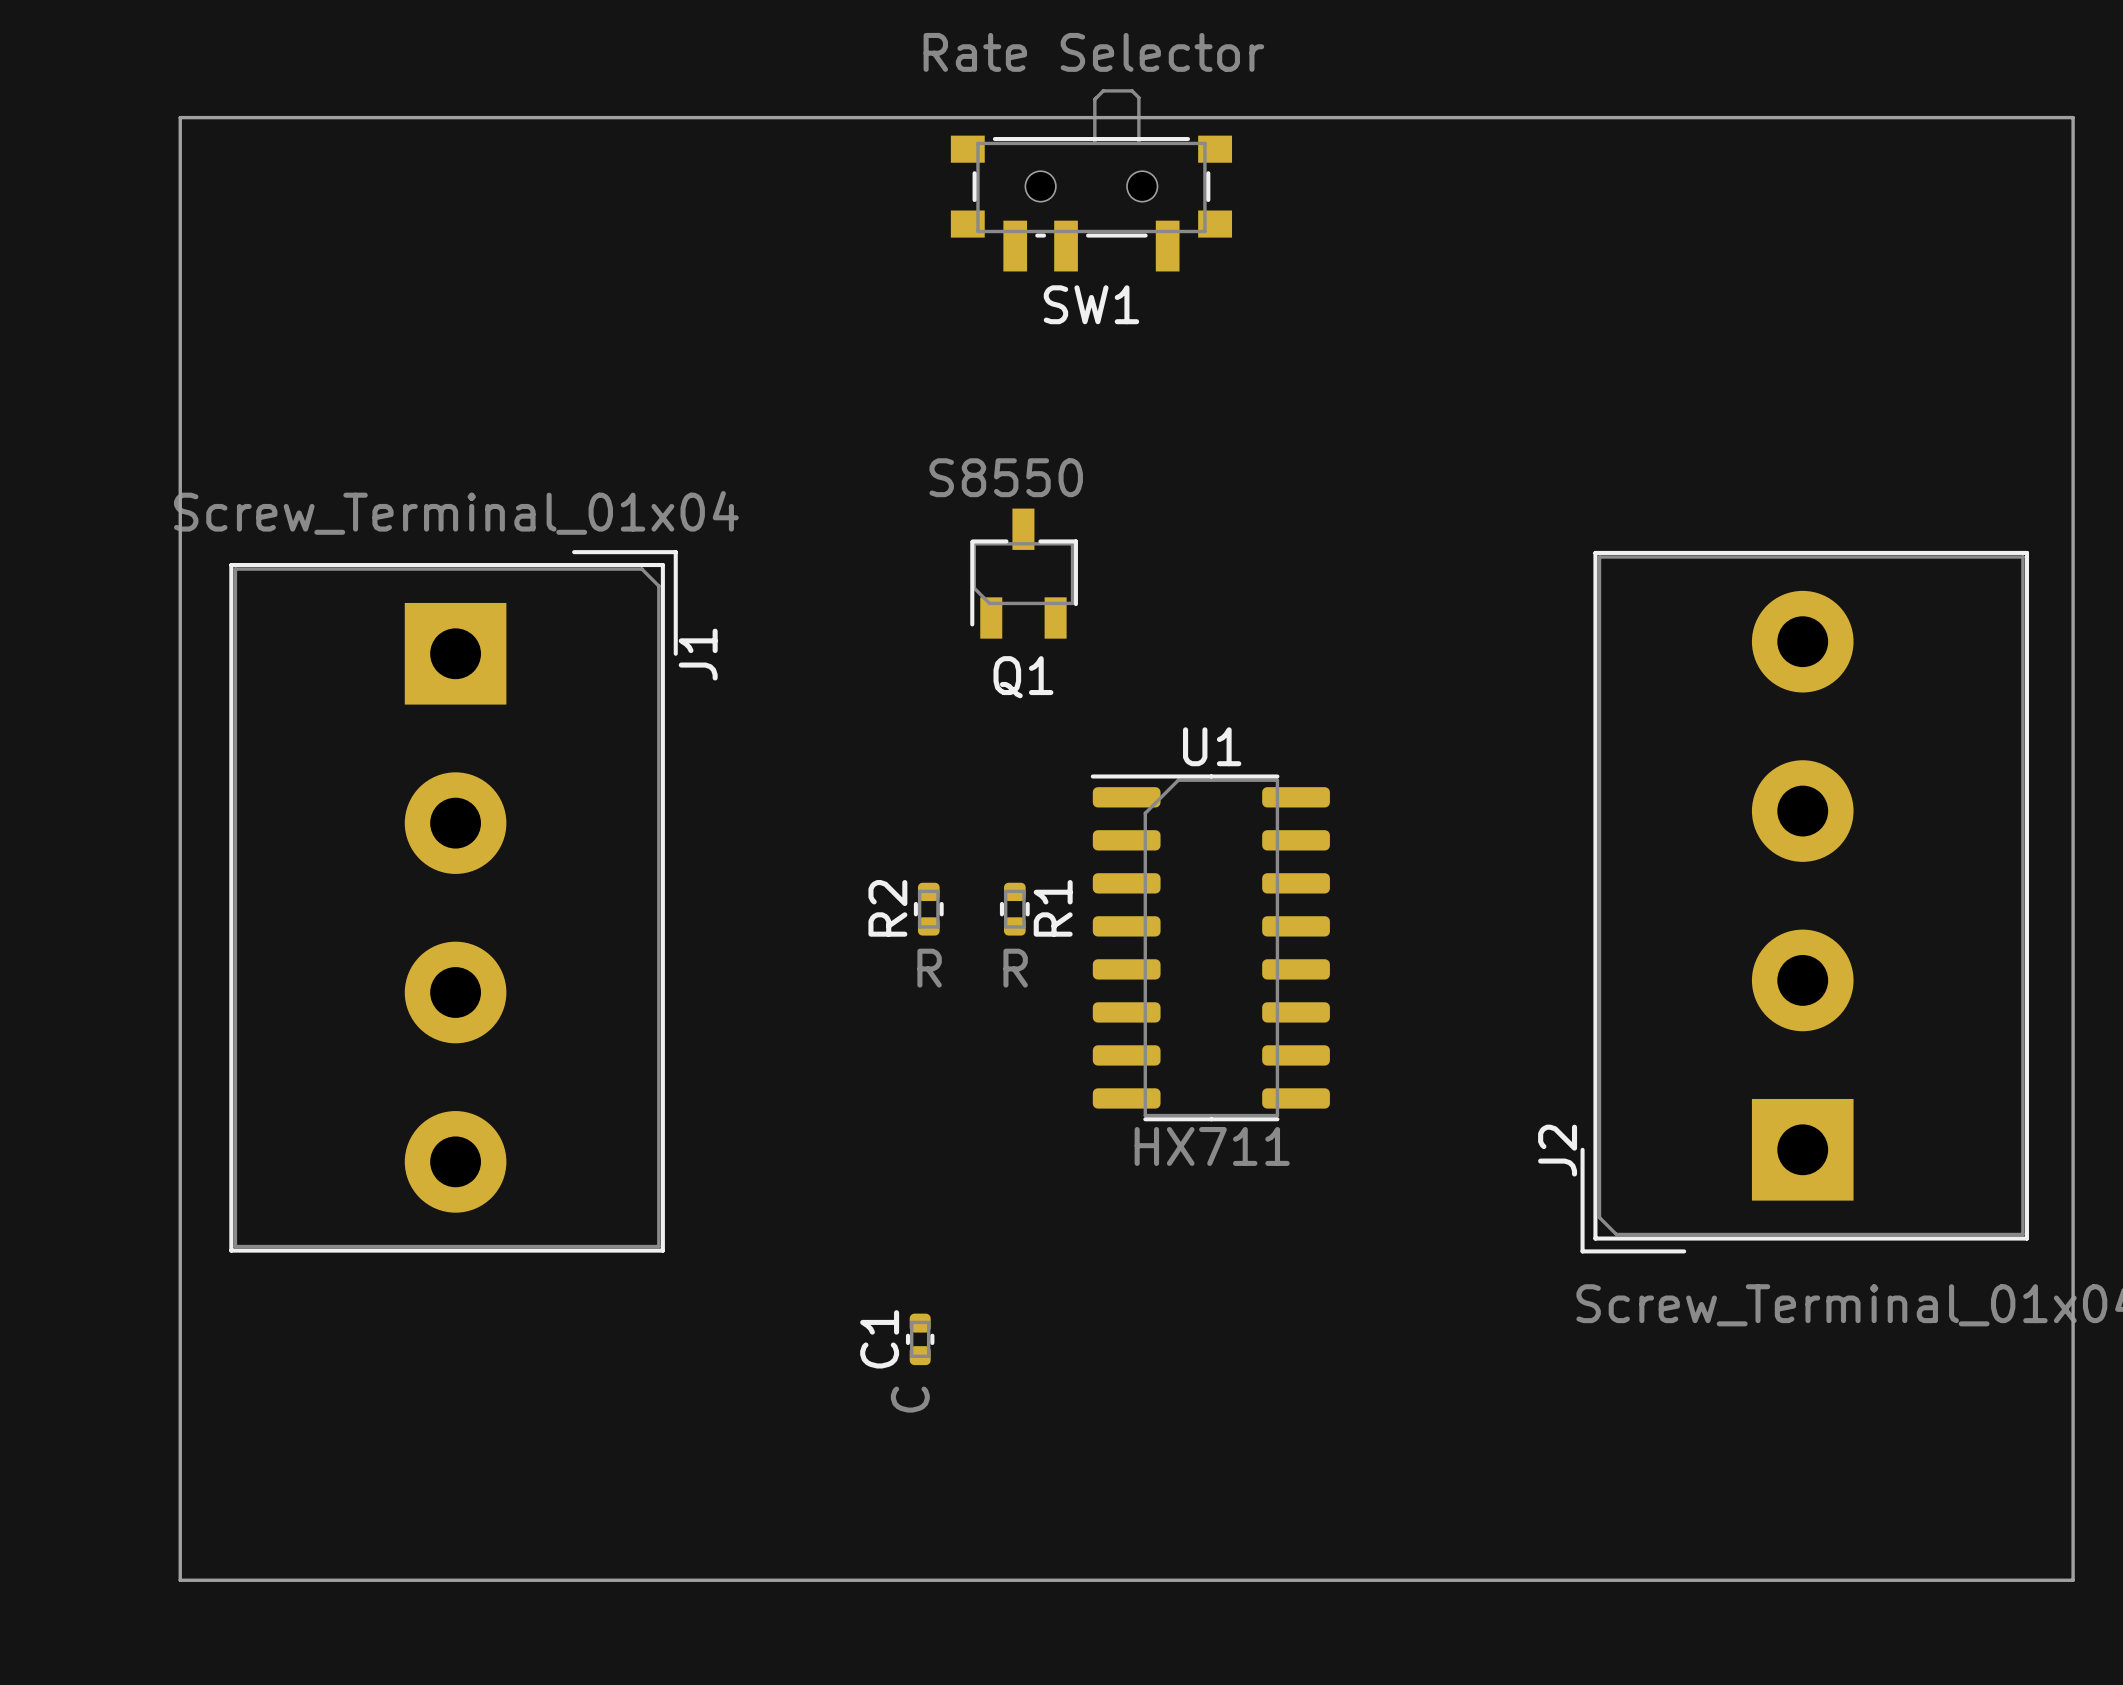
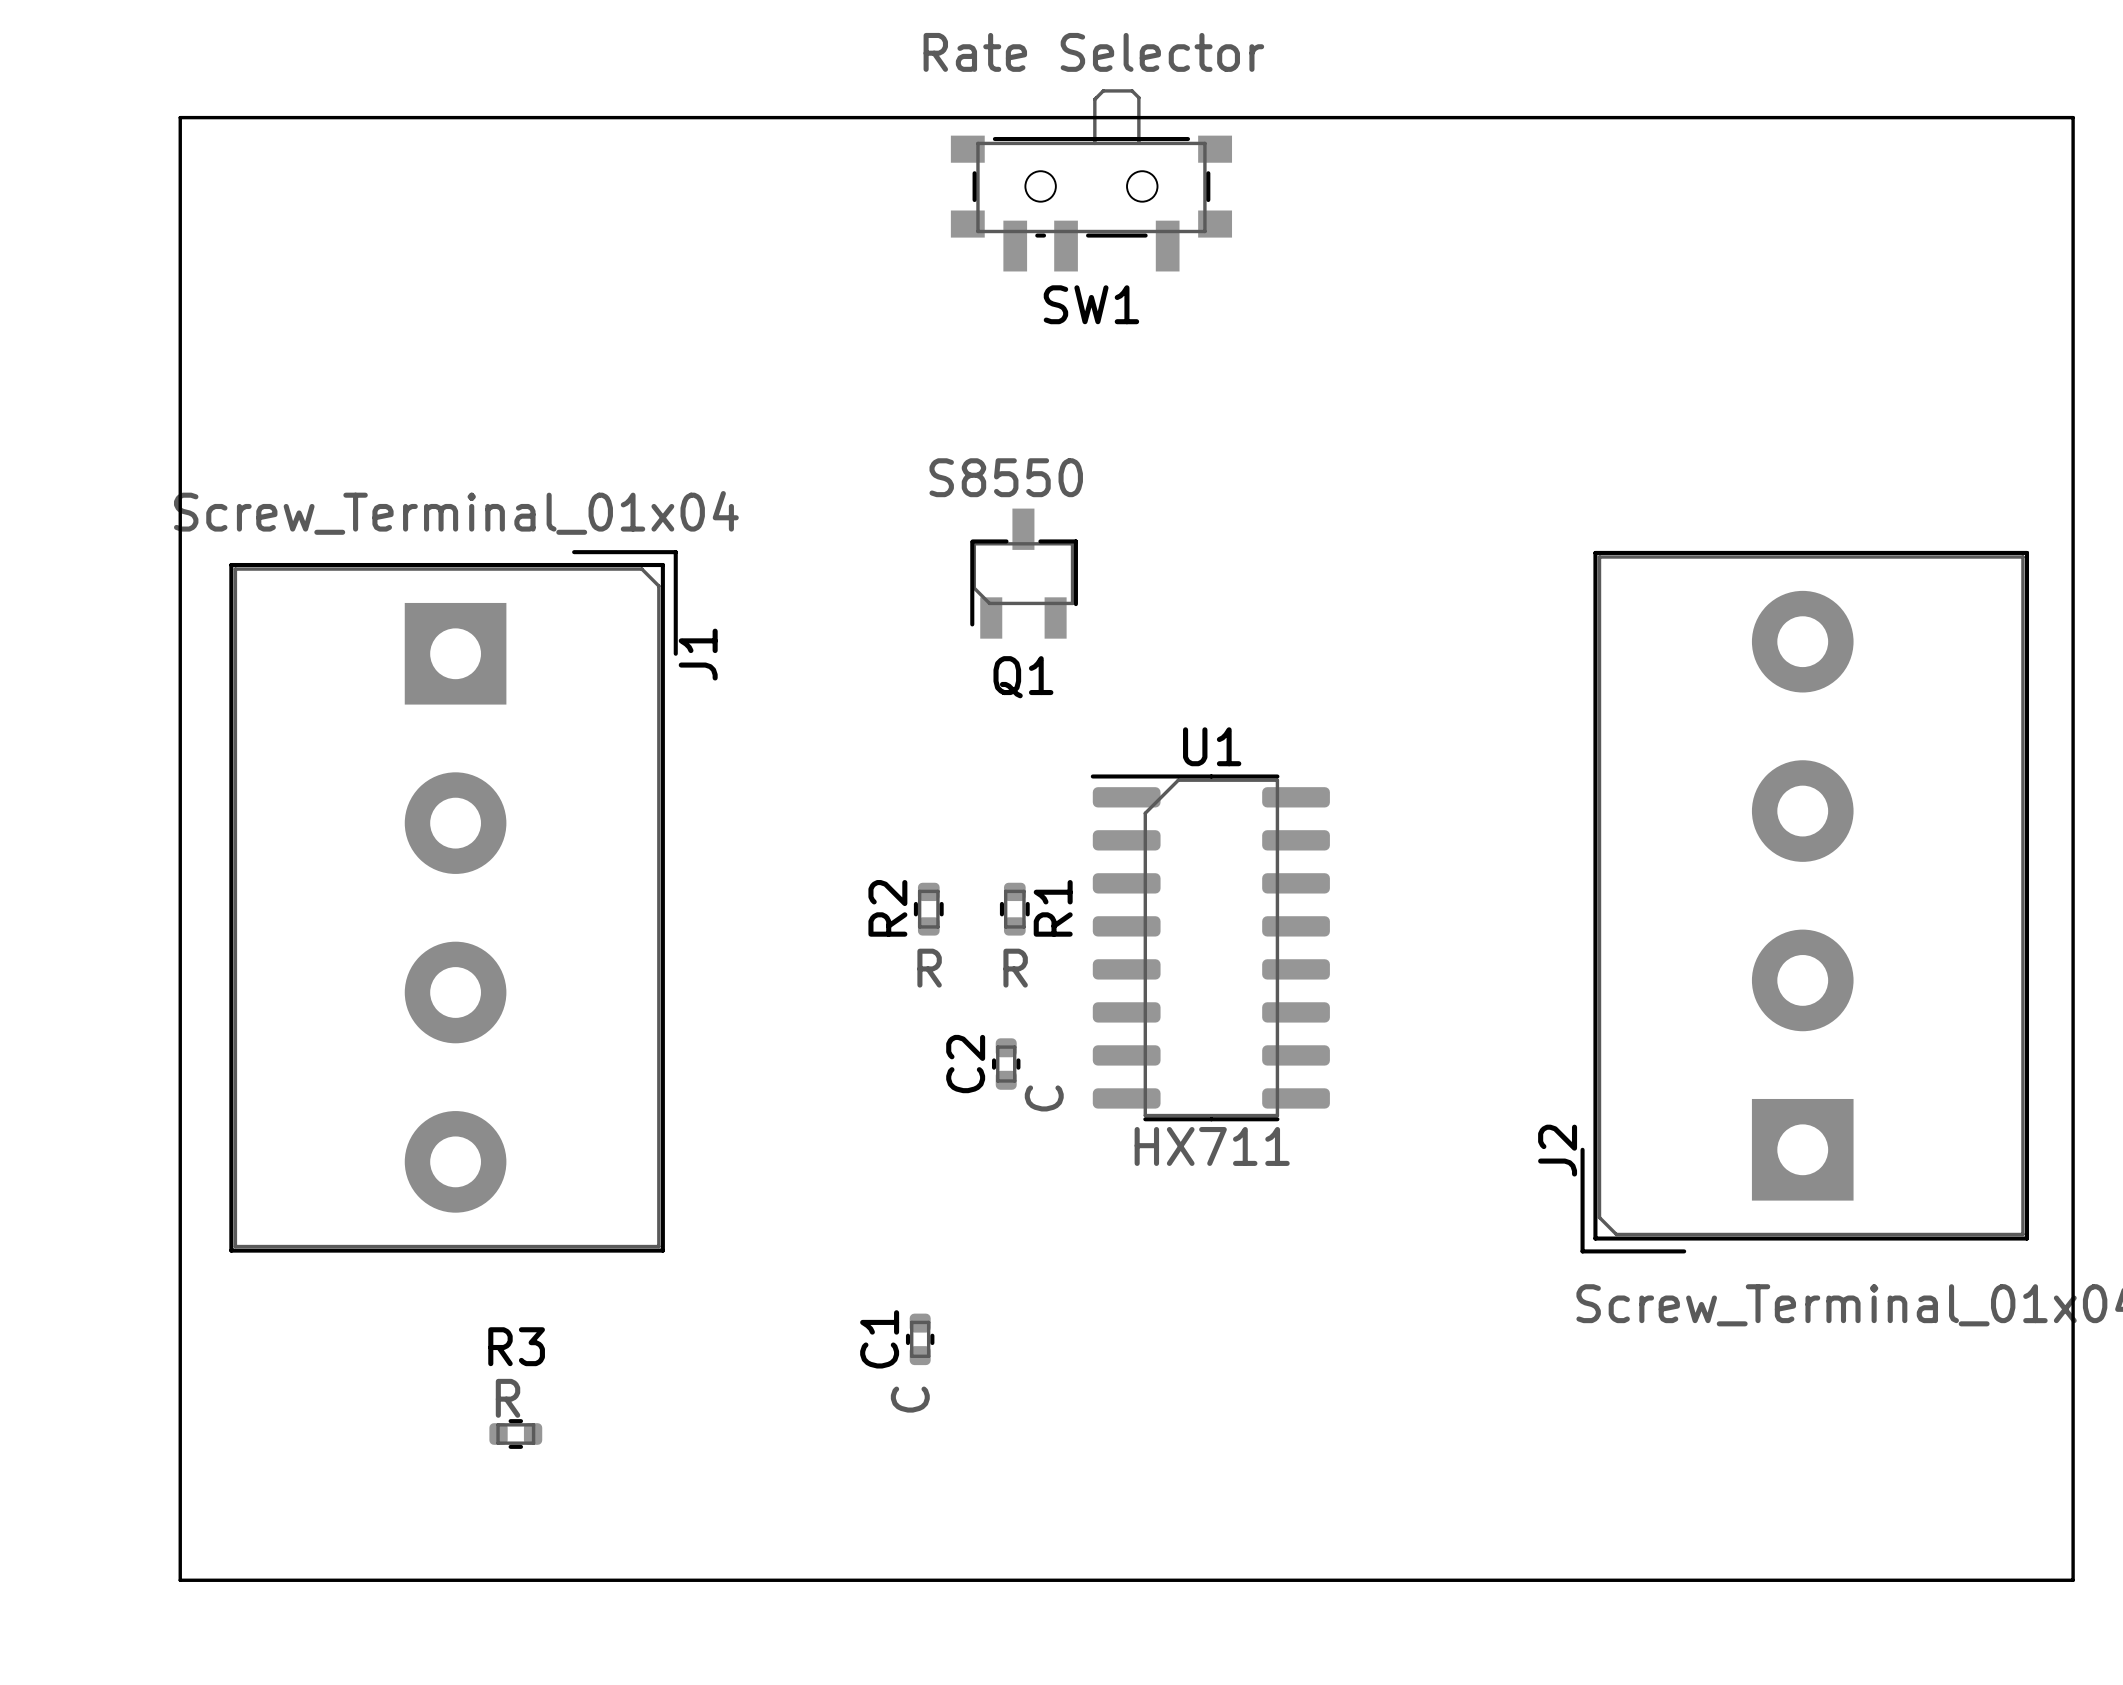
C2: none -> C (1006, 1064)
R3: none -> R (515, 1434)

